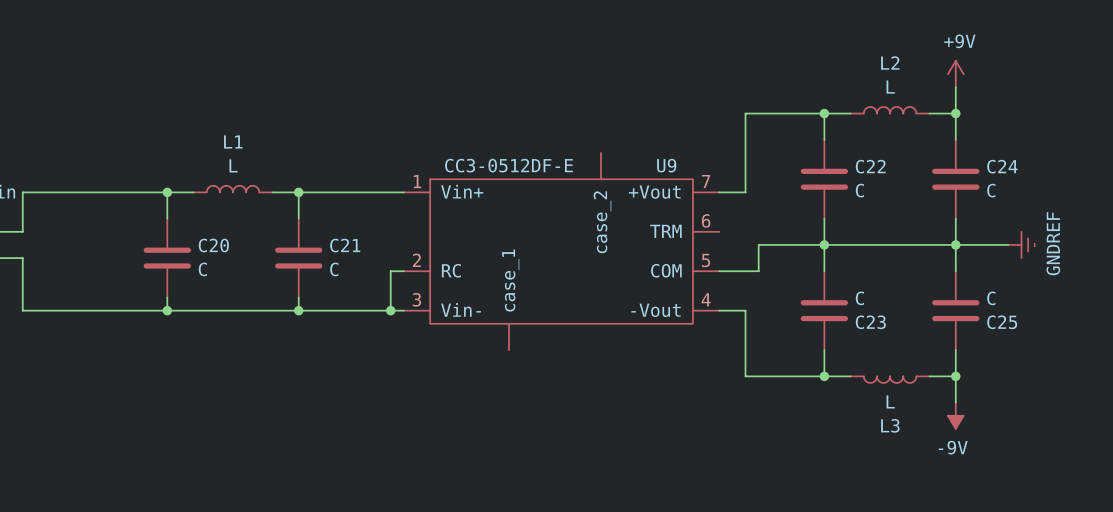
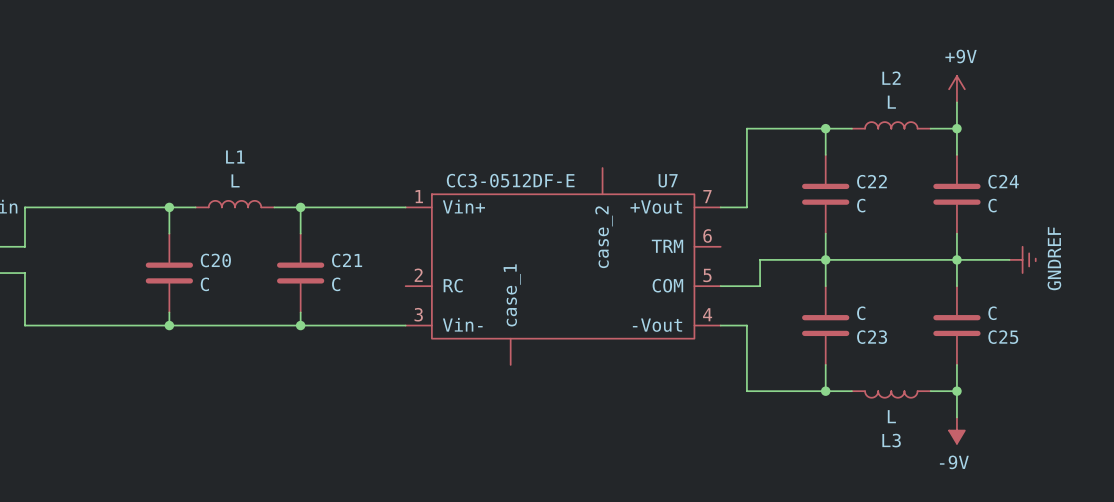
U9 name: U9 (666, 165) -> U7 (668, 180)
wire: (403, 271) (390, 271) (390, 310) -> none
junction: (390, 310) -> none

